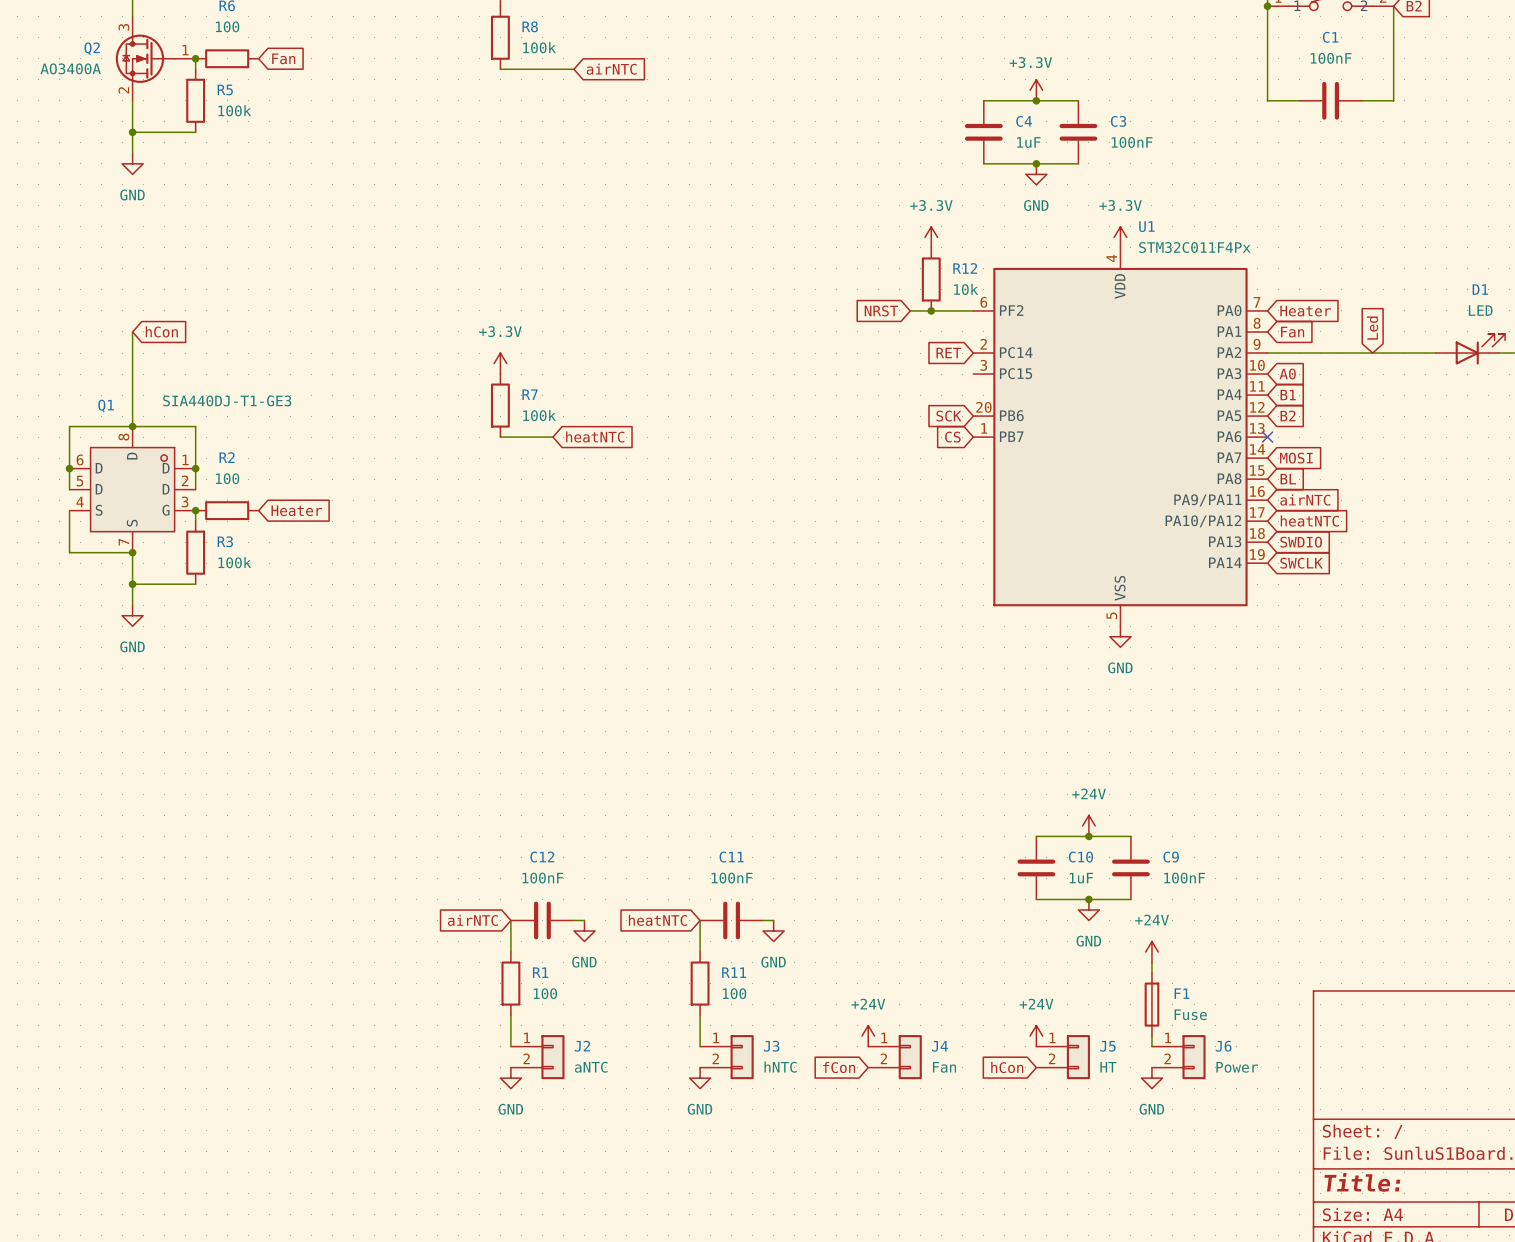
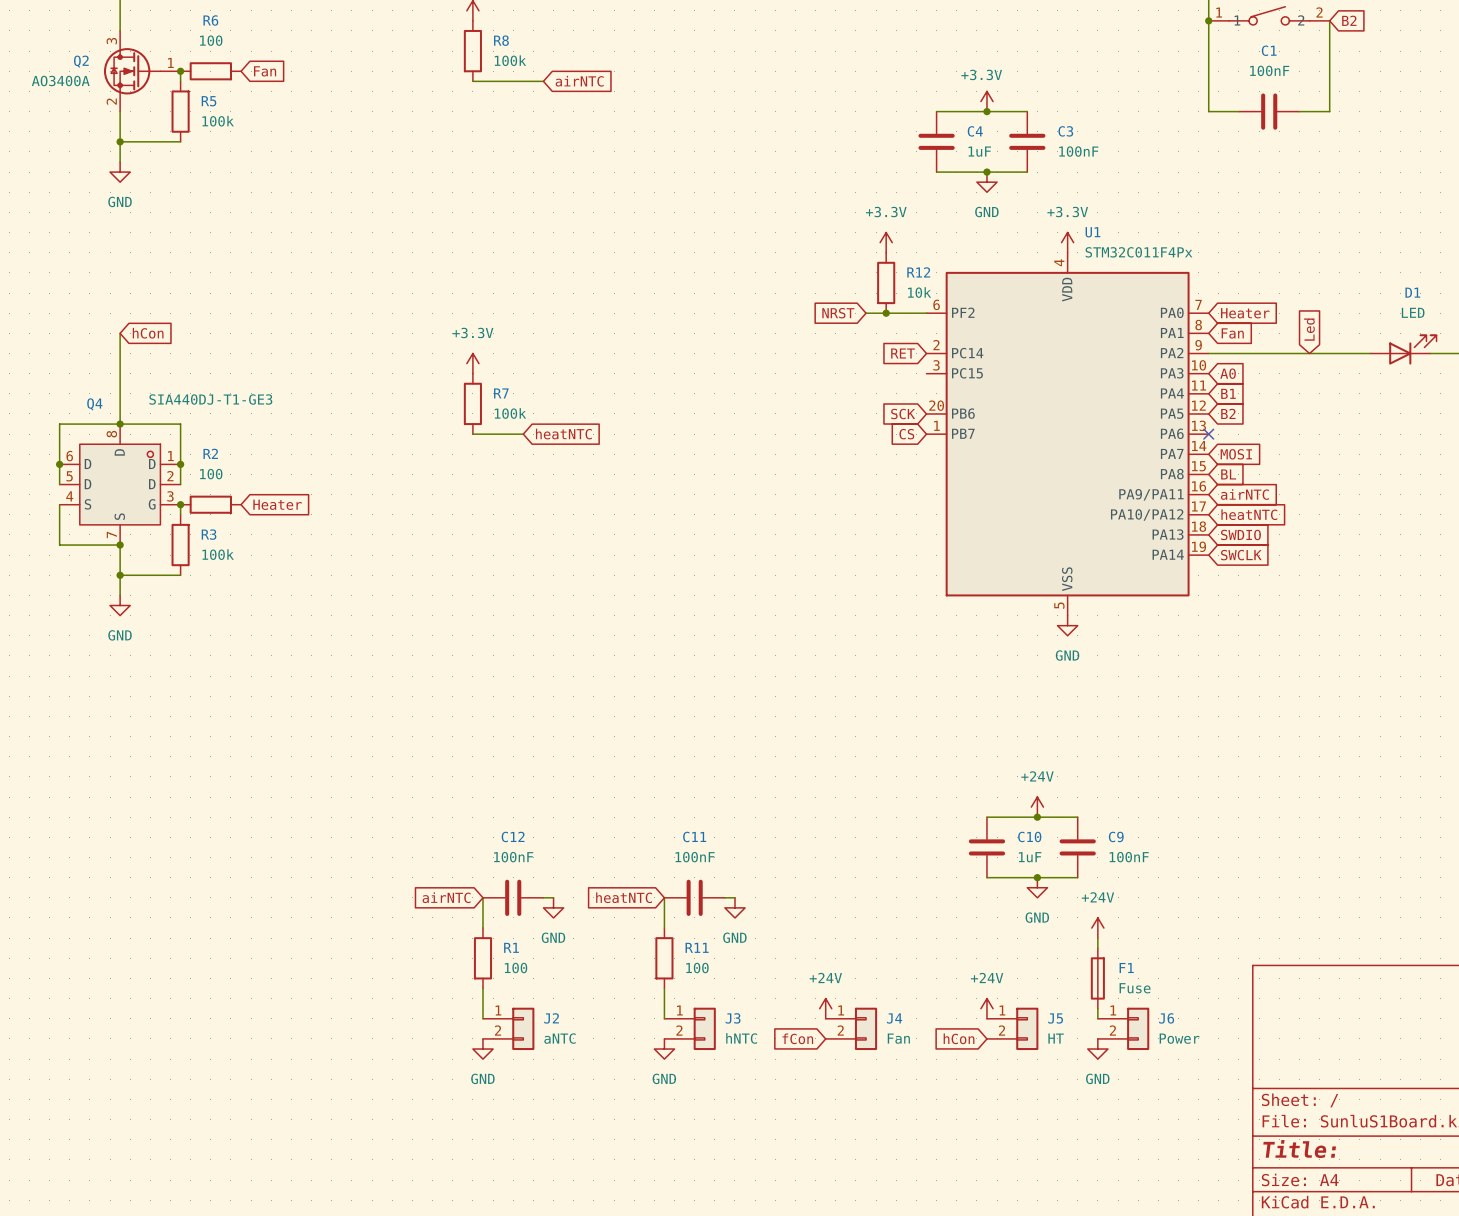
Q1 name: Q1 (106, 406) -> Q4 (94, 404)

